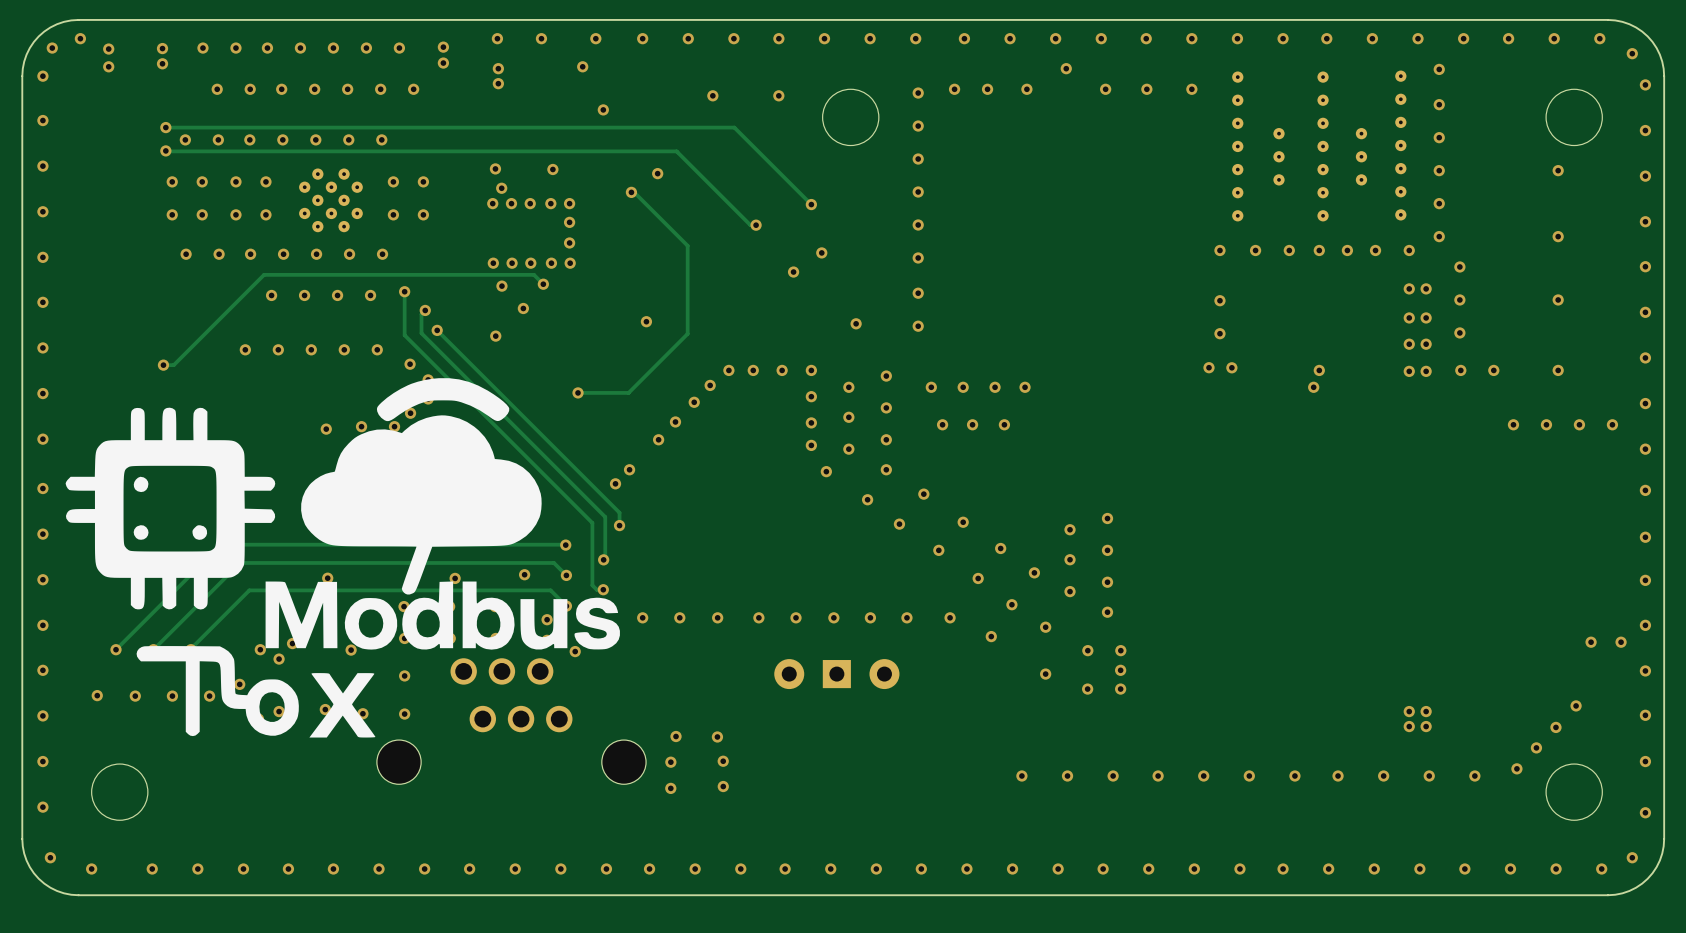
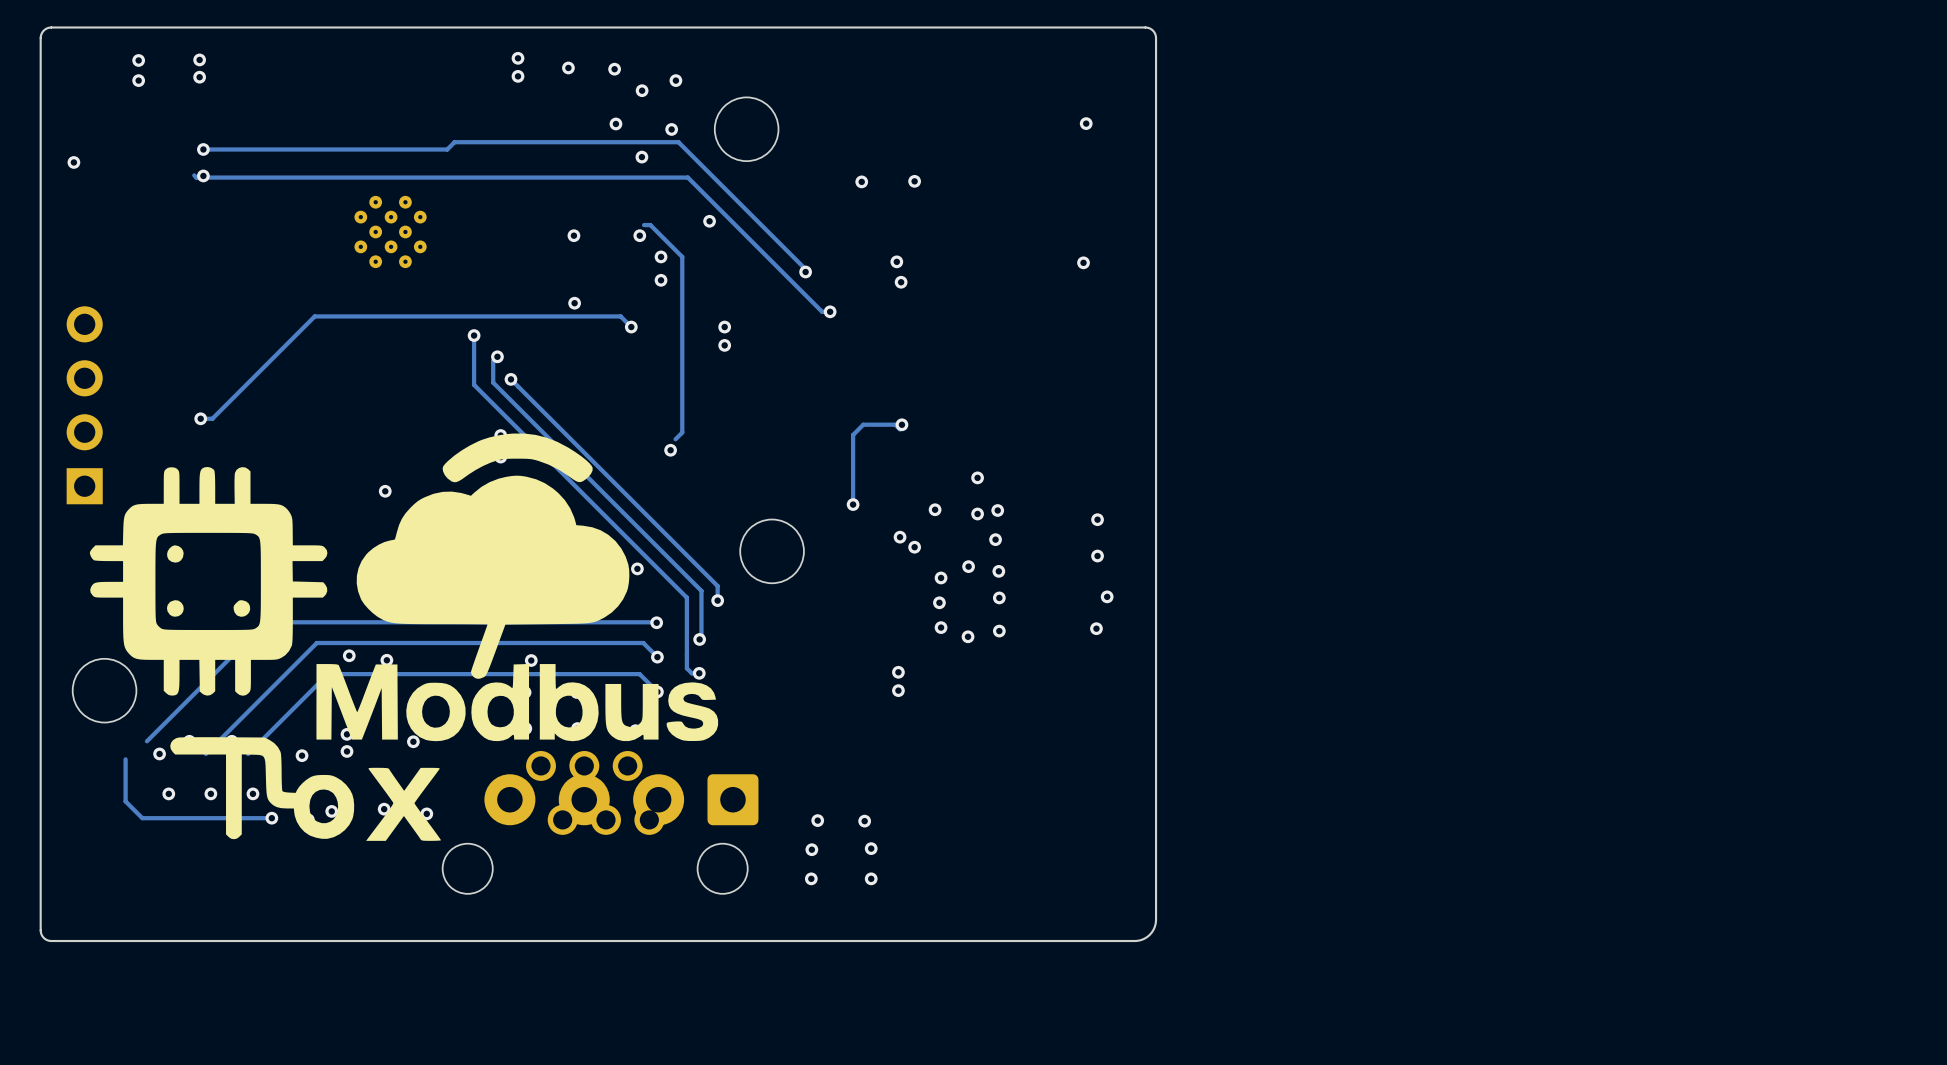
board edge: (78, 19) (57, 24) (38, 36) (26, 54) (22, 76) -> (104, 27) (51, 27) (43, 30) (40, 38) (40, 91)
board edge: (996, 19) (1607, 19) (1629, 24) (1642, 31) (1652, 41) (1659, 54) (1664, 76) (1664, 839) (1662, 853) (1656, 867) (1642, 883) (1622, 893) (1607, 895) (78, 895) (63, 893) (50, 887) (33, 873) (24, 853) (22, 816) -> (1145, 27) (1152, 30) (1156, 38) (1156, 919) (1153, 928) (1148, 936) (1134, 941) (51, 941) (43, 937) (40, 930)
via: (80, 38) -> none
via: (497, 38) -> none
via: (541, 38) -> none
via: (595, 38) -> none
via: (642, 38) -> none
via: (688, 38) -> none
via: (733, 38) -> none
via: (778, 38) -> none
via: (824, 38) -> none
via: (870, 38) -> none
via: (915, 38) -> none
via: (964, 38) -> none
via: (1010, 38) -> none
via: (1055, 38) -> none
via: (1101, 38) -> none
via: (1146, 38) -> none
via: (1191, 38) -> none
via: (1237, 38) -> none
via: (1283, 38) -> none
via: (1326, 38) -> none
via: (1372, 38) -> none
via: (1418, 38) -> none
via: (1463, 38) -> none
via: (1508, 38) -> none
via: (1554, 38) -> none
via: (1599, 38) -> none
via: (52, 48) -> none
via: (202, 48) -> none
via: (235, 48) -> none
via: (267, 48) -> none
via: (300, 48) -> none
via: (333, 48) -> none
via: (366, 48) -> none
via: (399, 48) -> none
via: (1632, 53) -> none
via: none -> (568, 67)
via: none -> (614, 69)
via: (498, 68) -> none
via: (1066, 68) -> none
via: (1439, 69) -> none
via: none -> (642, 90)
via: (42, 76) -> none
part: (1400, 76) -> none
part: (1237, 77) -> none
part: (1323, 77) -> none
round board edge: none -> [714, 96, 780, 162]
via: (498, 83) -> none
via: (1645, 84) -> none
round board edge: [822, 88, 880, 146] -> none
round board edge: [1545, 88, 1603, 146] -> none
via: (217, 89) -> none
via: (250, 89) -> none
via: (281, 89) -> none
via: (314, 89) -> none
via: (347, 89) -> none
via: (380, 89) -> none
via: (413, 89) -> none
via: (954, 89) -> none
via: (987, 89) -> none
via: (1026, 89) -> none
via: (1105, 89) -> none
via: (1146, 89) -> none
via: (1191, 89) -> none
via: (918, 93) -> none
via: (712, 95) -> none
via: (778, 95) -> none
part: (1400, 99) -> none
part: (1237, 100) -> none
part: (1323, 100) -> none
via: none -> (1086, 123)
via: (1439, 104) -> none
via: none -> (615, 123)
via position: (603, 109) -> (671, 129)
via: (42, 120) -> none
part: (1400, 122) -> none
part: (1237, 123) -> none
part: (1323, 123) -> none
via: (918, 126) -> none
track: (381, 127) (734, 127) (811, 204) -> (447, 149) (454, 142) (678, 142) (805, 269) (805, 272)
via: (1645, 130) -> none
part: (1279, 133) -> none
part: (1361, 133) -> none
via: none -> (641, 157)
via: (1439, 137) -> none
via: none -> (73, 162)
via: (185, 139) -> none
via: (218, 139) -> none
via: (249, 139) -> none
via: (282, 139) -> none
via: (315, 139) -> none
via: (348, 139) -> none
via: (381, 139) -> none
part: (1400, 145) -> none
part: (1237, 146) -> none
part: (1323, 146) -> none
track: none -> (194, 175) (196, 177) (687, 177) (822, 311) (830, 311)
track: (165, 150) (676, 151) (750, 225) (756, 225) -> none
via: none -> (914, 181)
via: none -> (861, 181)
part: (1279, 156) -> none
part: (1361, 156) -> none
via: (918, 159) -> none
via: (42, 166) -> none
via: (495, 168) -> none
part: (1400, 168) -> none
via: (552, 169) -> none
part: (1237, 169) -> none
part: (1323, 169) -> none
via: (1439, 170) -> none
via: (1558, 170) -> none
via: (657, 173) -> none
via: (1645, 176) -> none
part: (1279, 179) -> none
part: (1361, 179) -> none
via: (172, 181) -> none
via: (202, 181) -> none
via: (235, 181) -> none
via: (265, 181) -> none
via: (393, 181) -> none
via: (423, 181) -> none
via: (501, 188) -> none
part: (1400, 191) -> none
track: (631, 192) (634, 192) (687, 245) (687, 333) (628, 392) (578, 392) -> none
via position: (631, 192) -> (709, 221)
via: (918, 192) -> none
part: (1237, 192) -> none
part: (1323, 192) -> none
track: none -> (644, 225) (650, 225) (682, 256) (682, 432) (675, 439)
via: (511, 203) -> none
via: (530, 203) -> none
via: (569, 203) -> none
via: (1439, 203) -> none
via: (811, 204) -> none
via: (42, 211) -> none
via: (172, 214) -> none
via: (202, 214) -> none
via: (235, 214) -> none
via: (265, 214) -> none
via: (393, 214) -> none
via: (423, 214) -> none
part: (1400, 214) -> none
part: (1237, 215) -> none
part: (1323, 215) -> none
via: (1645, 221) -> none
via: (918, 224) -> none
via: (756, 225) -> none
via: none -> (896, 261)
via: none -> (1083, 262)
via: none -> (805, 272)
via: (1439, 236) -> none
via: (1558, 236) -> none
via: none -> (901, 282)
via: (1219, 250) -> none
via: (1255, 250) -> none
via: (1289, 250) -> none
via: (1319, 250) -> none
via: (1347, 250) -> none
via: (1375, 250) -> none
via: (1409, 250) -> none
via: (821, 252) -> none
via: (186, 254) -> none
via: (219, 254) -> none
via: (250, 254) -> none
via: (283, 254) -> none
via: (316, 254) -> none
via: (349, 254) -> none
via: (382, 254) -> none
via: (42, 257) -> none
via: (918, 257) -> none
via: (512, 263) -> none
via: (530, 263) -> none
via: (551, 263) -> none
via: (570, 263) -> none
via: (1459, 266) -> none
via: (1645, 266) -> none
via: none -> (830, 311)
via: (793, 272) -> none
via: none -> (724, 327)
via: (501, 286) -> none
via: (1409, 288) -> none
via: (1426, 288) -> none
via: (918, 293) -> none
via: (271, 295) -> none
via: (304, 295) -> none
via: (337, 295) -> none
via: (370, 295) -> none
via: (1459, 299) -> none
via: (1558, 299) -> none
via: none -> (724, 345)
via: (1219, 300) -> none
via: (42, 302) -> none
via: (523, 308) -> none
via: (1645, 312) -> none
via: (1409, 317) -> none
via: (1426, 317) -> none
via: (646, 321) -> none
via: (856, 323) -> none
via: (918, 326) -> none
via: (1459, 332) -> none
via: (1219, 333) -> none
via: (495, 336) -> none
via: (1409, 344) -> none
via: (1426, 344) -> none
via: (42, 347) -> none
via: (245, 349) -> none
via: (278, 349) -> none
via: (311, 349) -> none
via: (344, 349) -> none
via: (377, 349) -> none
part: none -> (84, 405)
via: (1645, 357) -> none
via: (410, 364) -> none
via: (1209, 367) -> none
via: (1231, 367) -> none
via: (728, 370) -> none
via: (753, 370) -> none
via: (811, 370) -> none
via: (1319, 370) -> none
via: (1460, 370) -> none
via: (1493, 370) -> none
via: (1558, 370) -> none
via: (1409, 371) -> none
via: (1426, 371) -> none
track: none -> (900, 429) (895, 424) (863, 424) (853, 434) (853, 504)
via: (886, 376) -> none
via: (710, 385) -> none
via: (848, 387) -> none
via: (931, 387) -> none
via: (963, 387) -> none
via: (995, 387) -> none
via: (1025, 387) -> none
via: (1313, 387) -> none
via: (42, 393) -> none
via: (811, 396) -> none
via: (694, 402) -> none
via: (1645, 403) -> none
via: (886, 407) -> none
via: (410, 413) -> none
via: (675, 421) -> none
via: (811, 422) -> none
via: (942, 424) -> none
via: (972, 424) -> none
via: (1004, 424) -> none
via: (1513, 424) -> none
via: (1546, 424) -> none
via: (1579, 424) -> none
via: (1612, 424) -> none
via: (361, 426) -> none
via: (394, 426) -> none
via: (42, 439) -> none
via: (658, 439) -> none
via: (886, 439) -> none
via: none -> (853, 504)
via: none -> (997, 510)
via: (1645, 449) -> none
round board edge: none -> [739, 518, 805, 584]
via: none -> (1097, 519)
via: (629, 469) -> none
via: none -> (900, 537)
via: (886, 469) -> none
via: (826, 471) -> none
via: none -> (995, 539)
via: none -> (914, 547)
via: (615, 483) -> none
via: none -> (1097, 556)
via: (42, 488) -> none
via: (1645, 490) -> none
via: (923, 494) -> none
via: none -> (968, 566)
via: none -> (637, 568)
via: none -> (941, 577)
via: (1107, 518) -> none
via: none -> (999, 597)
via: (899, 524) -> none
via: none -> (939, 602)
via: (1070, 529) -> none
via: (42, 534) -> none
via: (1645, 537) -> none
via: (1000, 548) -> none
via: none -> (941, 627)
via position: (938, 550) -> (1096, 628)
via: (1107, 550) -> none
via: none -> (999, 631)
via: none -> (968, 636)
via: (1070, 559) -> none
track: (265, 562) (240, 562) (153, 649) -> (316, 643) (205, 753)
via: (1034, 572) -> none
via: none -> (349, 655)
via: (524, 574) -> none
via: (978, 578) -> none
via: (42, 579) -> none
via: (1645, 580) -> none
via: (1107, 582) -> none
via: none -> (898, 672)
track: (275, 590) (249, 590) (190, 649) -> (328, 674) (248, 753)
via: (1070, 591) -> none
via: none -> (898, 690)
via: (1011, 604) -> none
via: (404, 606) -> none
via: (1107, 612) -> none
via: (642, 617) -> none
via: (679, 617) -> none
via: (717, 617) -> none
via: (758, 617) -> none
via: (796, 617) -> none
via: (833, 617) -> none
via: (870, 617) -> none
via: (906, 617) -> none
via: (950, 617) -> none
via: (547, 619) -> none
via: (42, 625) -> none
via: (1645, 625) -> none
via: (1045, 627) -> none
via: (991, 636) -> none
via: (404, 638) -> none
via: (1591, 642) -> none
via: (1621, 642) -> none
via position: (116, 649) -> (159, 753)
via: (260, 649) -> none
via: (1087, 650) -> none
via: (1120, 650) -> none
via: (575, 651) -> none
via: none -> (347, 751)
via: (279, 659) -> none
via: none -> (302, 755)
track: none -> (125, 759) (125, 801) (142, 818) (271, 818)
via: (42, 670) -> none
via: (1120, 670) -> none
via: (1645, 670) -> none
part: (836, 674) -> none
via: (1045, 674) -> none
via: (404, 675) -> none
via: (239, 684) -> none
via: (1087, 689) -> none
via: (1120, 689) -> none
via: (97, 695) -> none
part: none -> (621, 799)
via: (1576, 705) -> none
via: (1409, 711) -> none
via: (1426, 711) -> none
via: (404, 714) -> none
via: (42, 715) -> none
via: (1645, 715) -> none
via: none -> (271, 818)
via: none -> (817, 820)
via: none -> (864, 821)
via: (1409, 726) -> none
via: (1426, 726) -> none
via: (1555, 727) -> none
via: (676, 736) -> none
via: (717, 736) -> none
via: none -> (871, 848)
via: none -> (811, 849)
via: (1536, 747) -> none
via: (42, 761) -> none
via: (723, 761) -> none
via: (1645, 761) -> none
via: (670, 762) -> none
round board edge: [1545, 763, 1603, 821] -> none
via: (1516, 768) -> none
via: none -> (811, 878)
via: none -> (871, 878)
via: (1021, 775) -> none
via: (1067, 775) -> none
via: (1113, 775) -> none
via: (1158, 775) -> none
via: (1203, 775) -> none
via: (1249, 775) -> none
via: (1294, 775) -> none
via: (1338, 775) -> none
via: (1383, 775) -> none
via: (1429, 775) -> none
via: (1474, 775) -> none
via: (723, 786) -> none
via: (670, 788) -> none
round board edge position: (119, 792) -> (104, 690)
via: (42, 807) -> none
via: (1645, 812) -> none
via: (50, 857) -> none
via: (1632, 857) -> none
via: (91, 868) -> none
via: (152, 868) -> none
via: (197, 868) -> none
via: (243, 868) -> none
via: (288, 868) -> none
via: (333, 868) -> none
via: (379, 868) -> none
via: (424, 868) -> none
via: (469, 868) -> none
via: (515, 868) -> none
via: (560, 868) -> none
via: (606, 868) -> none
via: (649, 868) -> none
via: (695, 868) -> none
via: (740, 868) -> none
via: (785, 868) -> none
via: (830, 868) -> none
via: (876, 868) -> none
via: (921, 868) -> none
via: (966, 868) -> none
via: (1012, 868) -> none
via: (1058, 868) -> none
via: (1103, 868) -> none
via: (1148, 868) -> none
via: (1194, 868) -> none
via: (1239, 868) -> none
via: (1283, 868) -> none
via: (1328, 868) -> none
via: (1374, 868) -> none
via: (1419, 868) -> none
via: (1464, 868) -> none
via: (1510, 868) -> none
via: (1556, 868) -> none
via: (1601, 868) -> none

